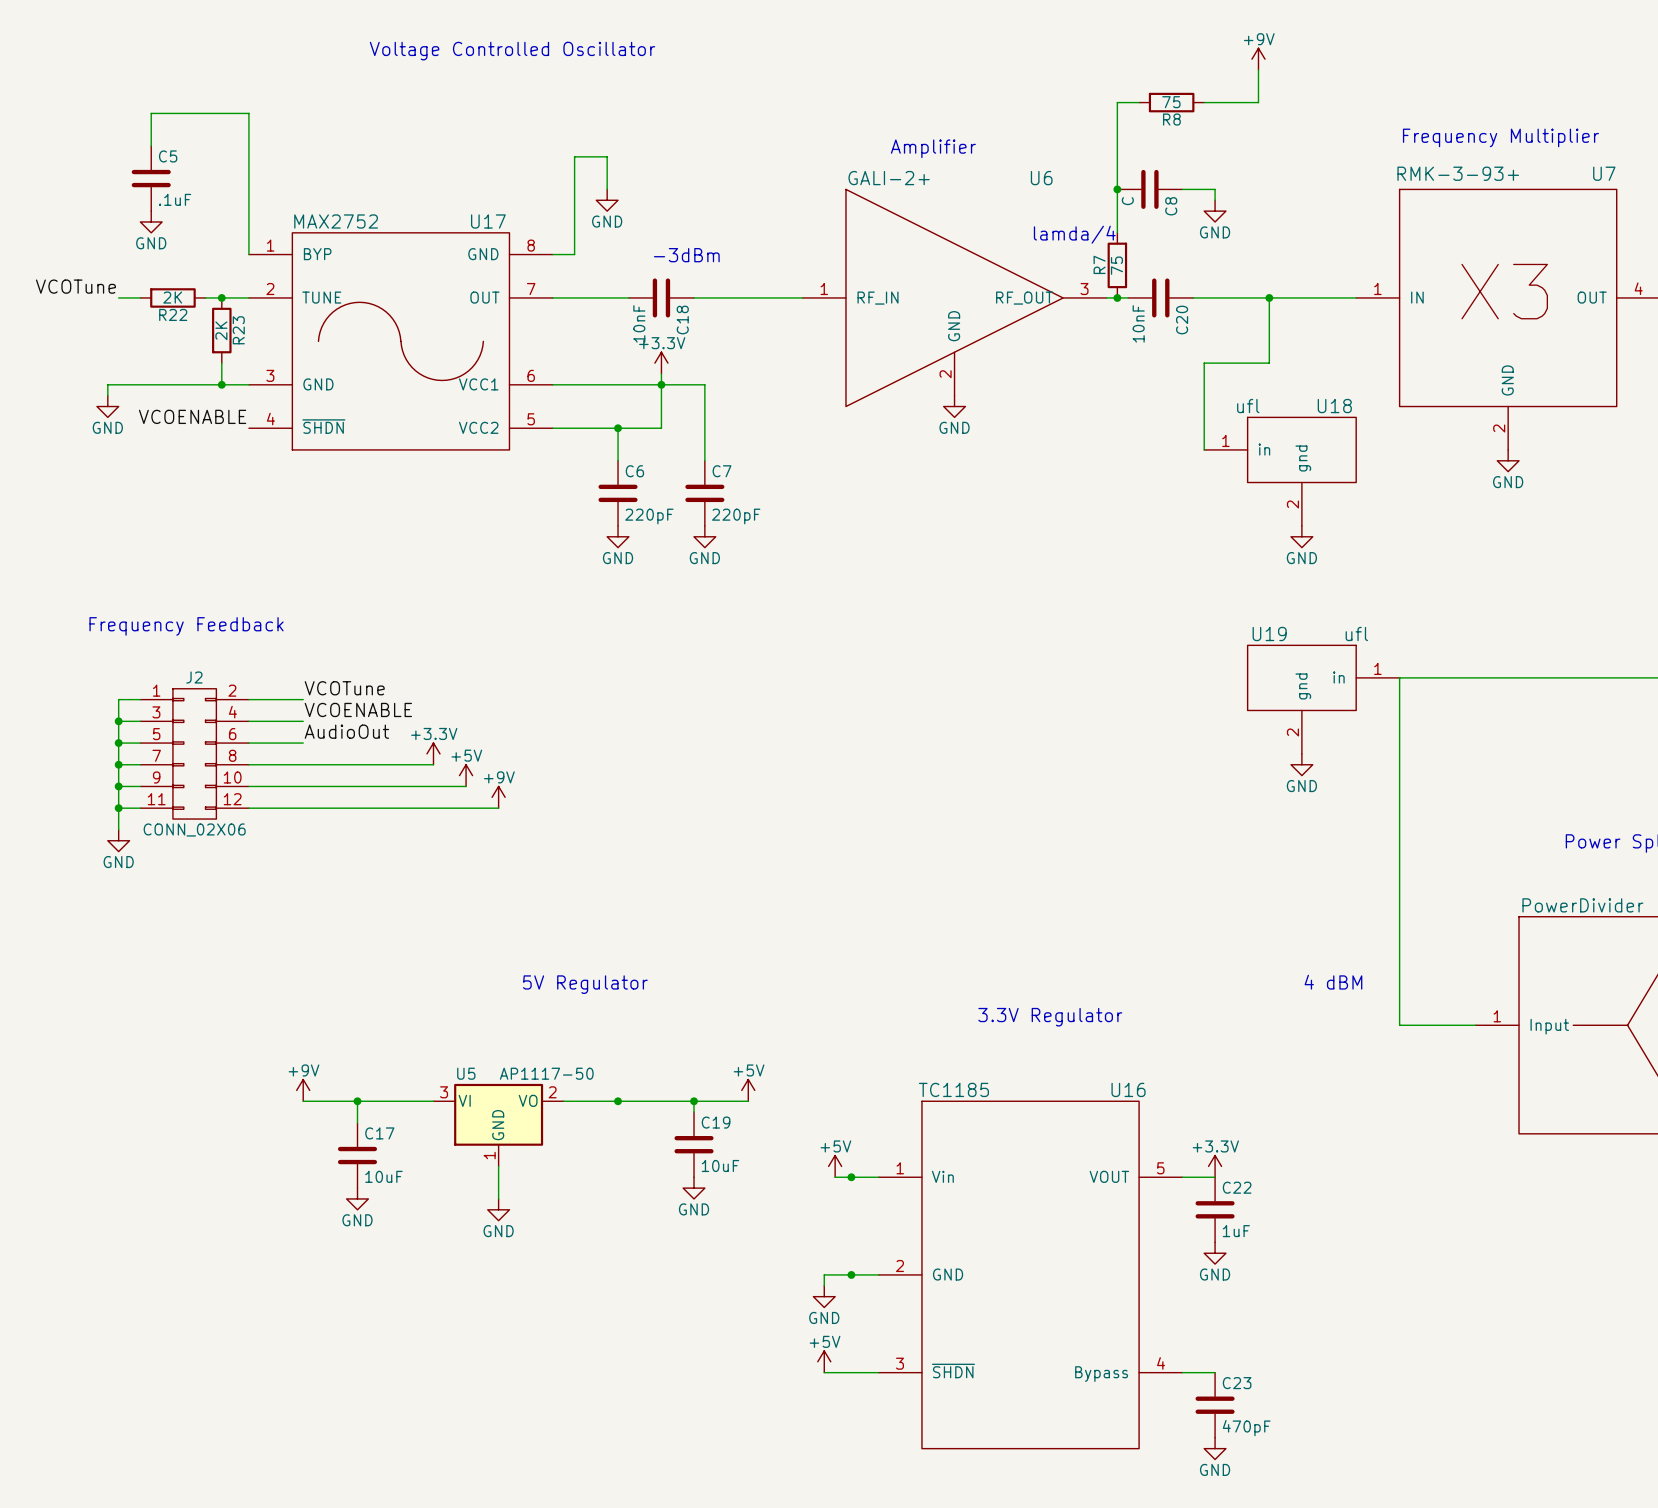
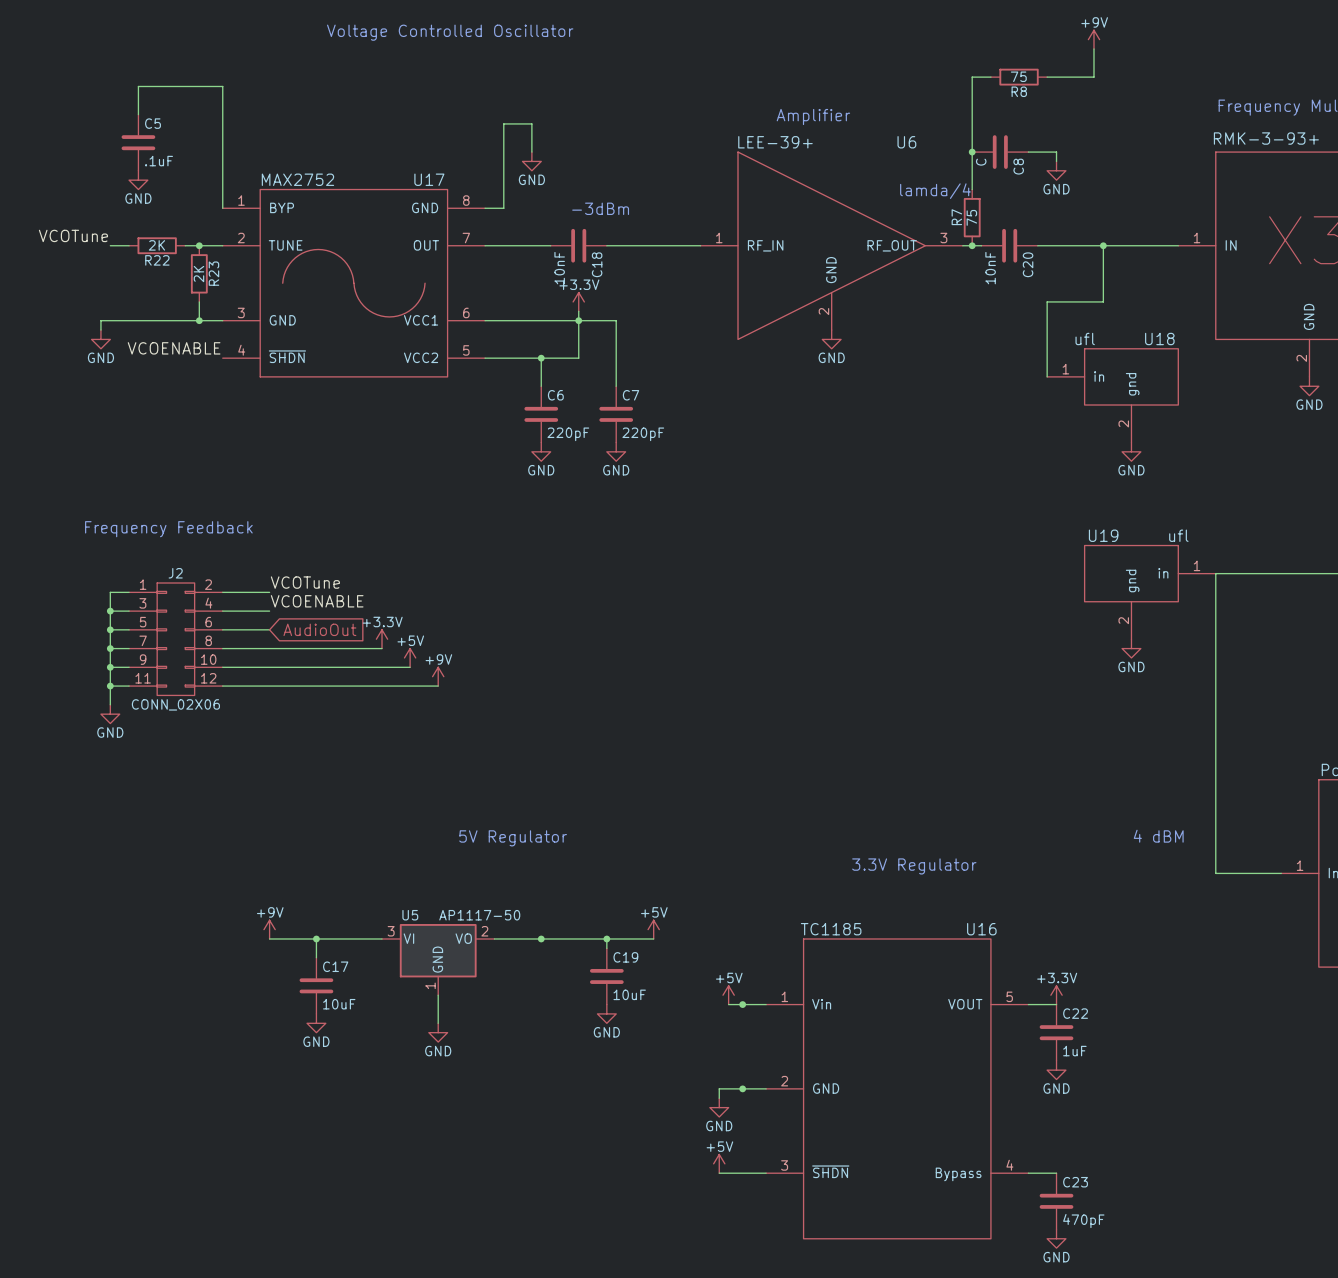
U6 value: GALI-2+ (889, 178) -> LEE-39+ (775, 142)
label: AudioOut (346, 731) -> none
global label: none -> AudioOut (319, 629)

